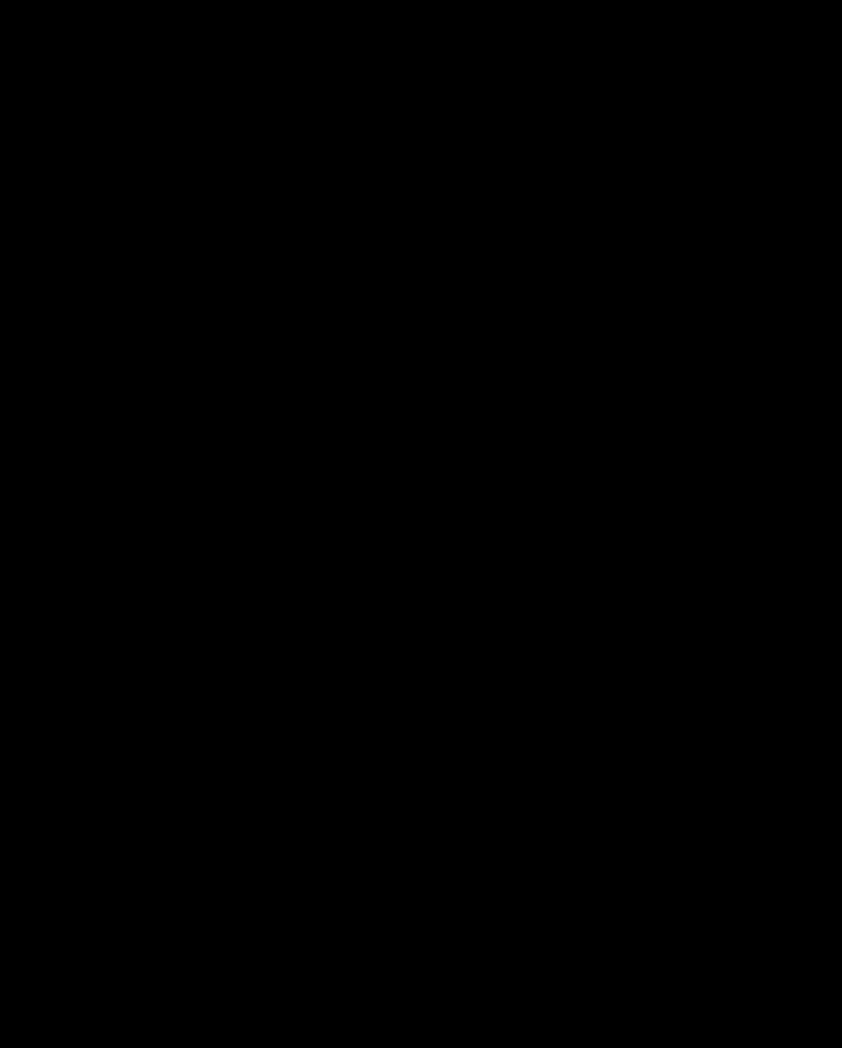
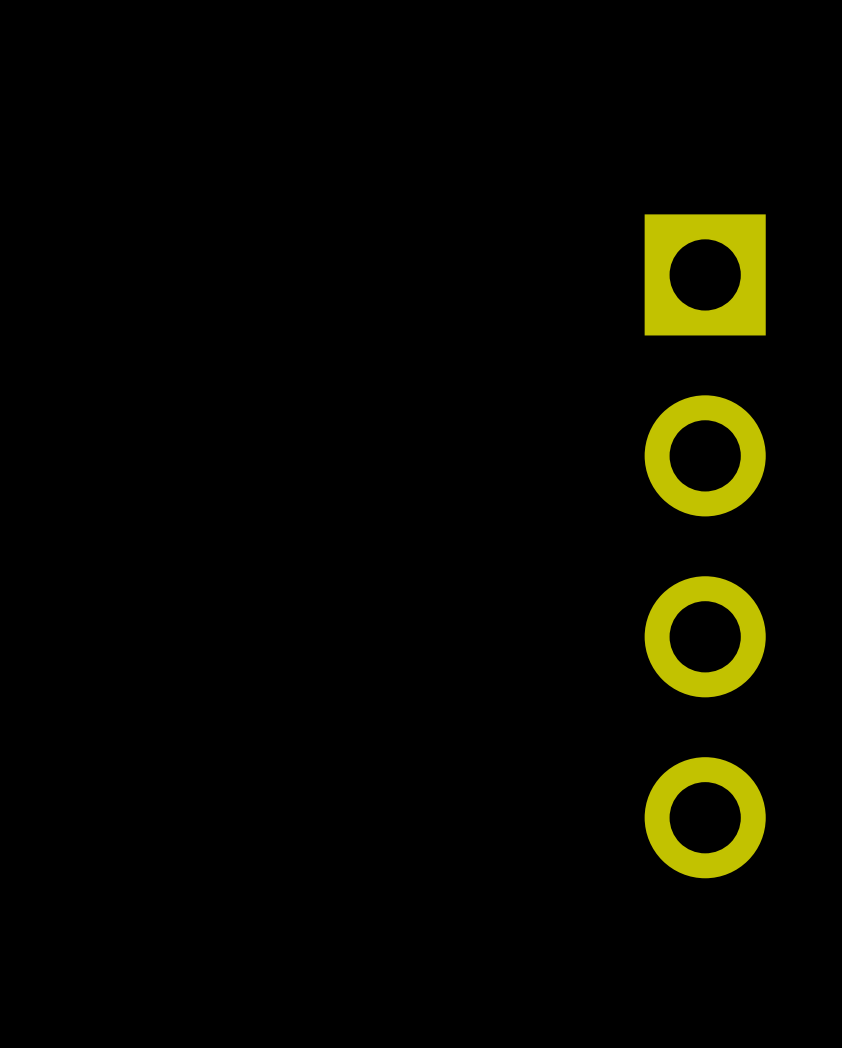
part: none -> (705, 546)

